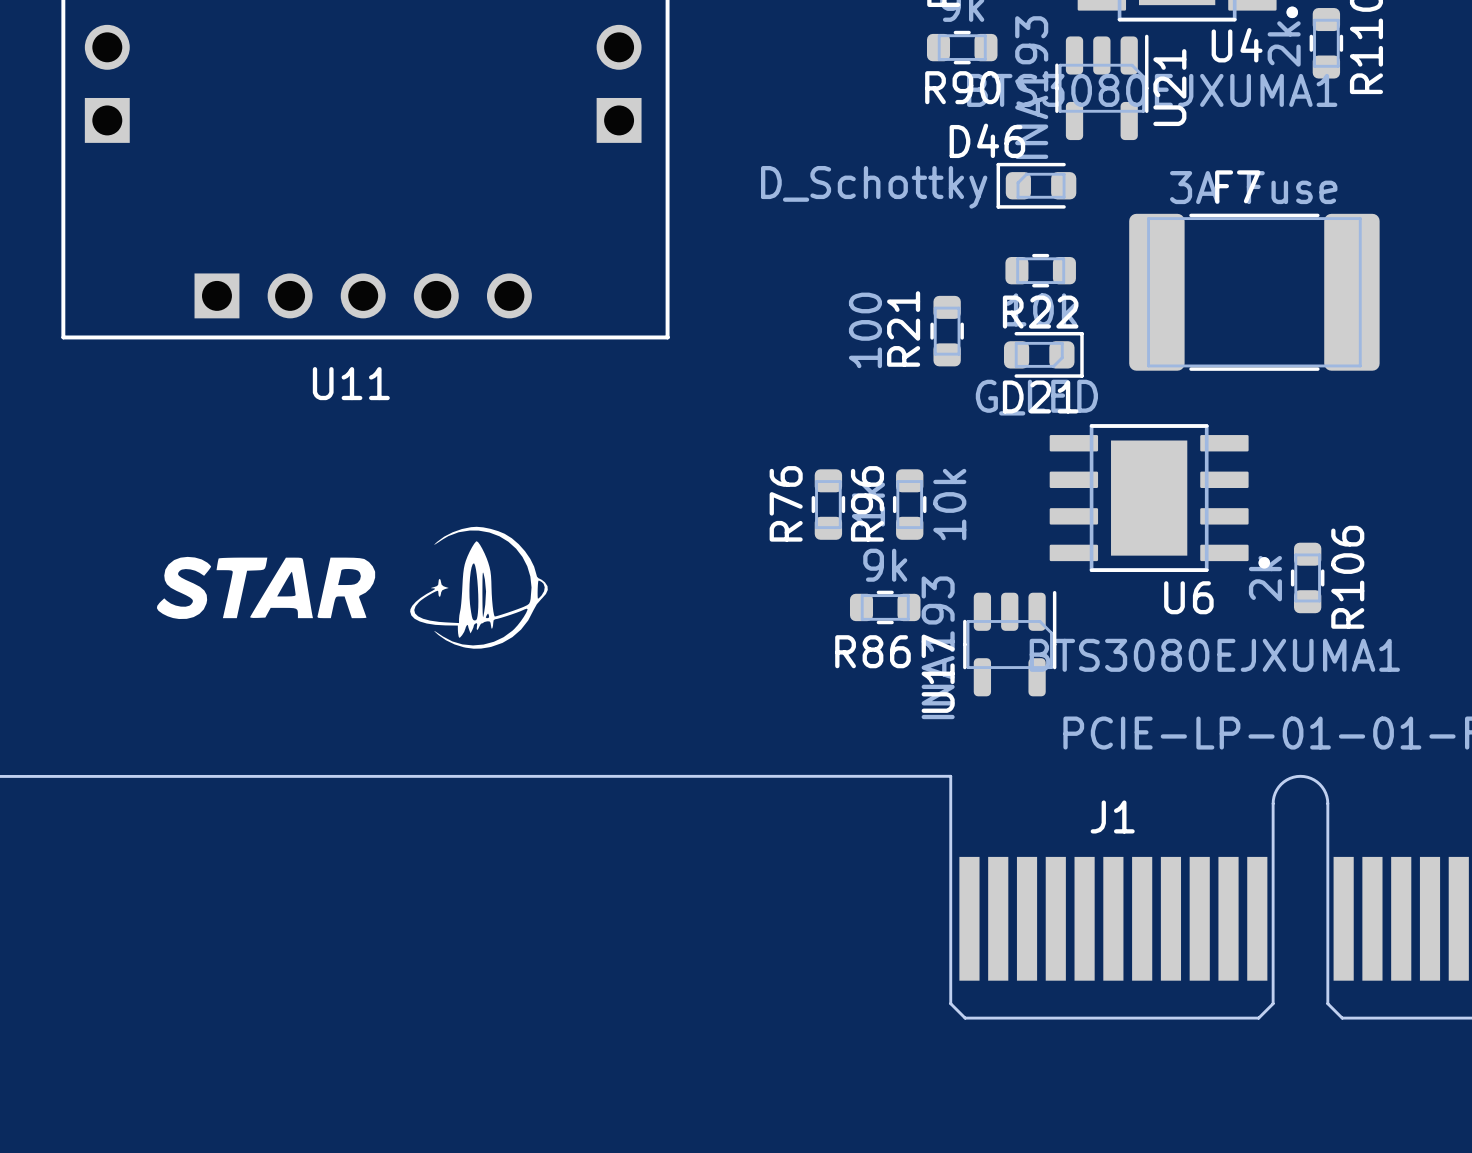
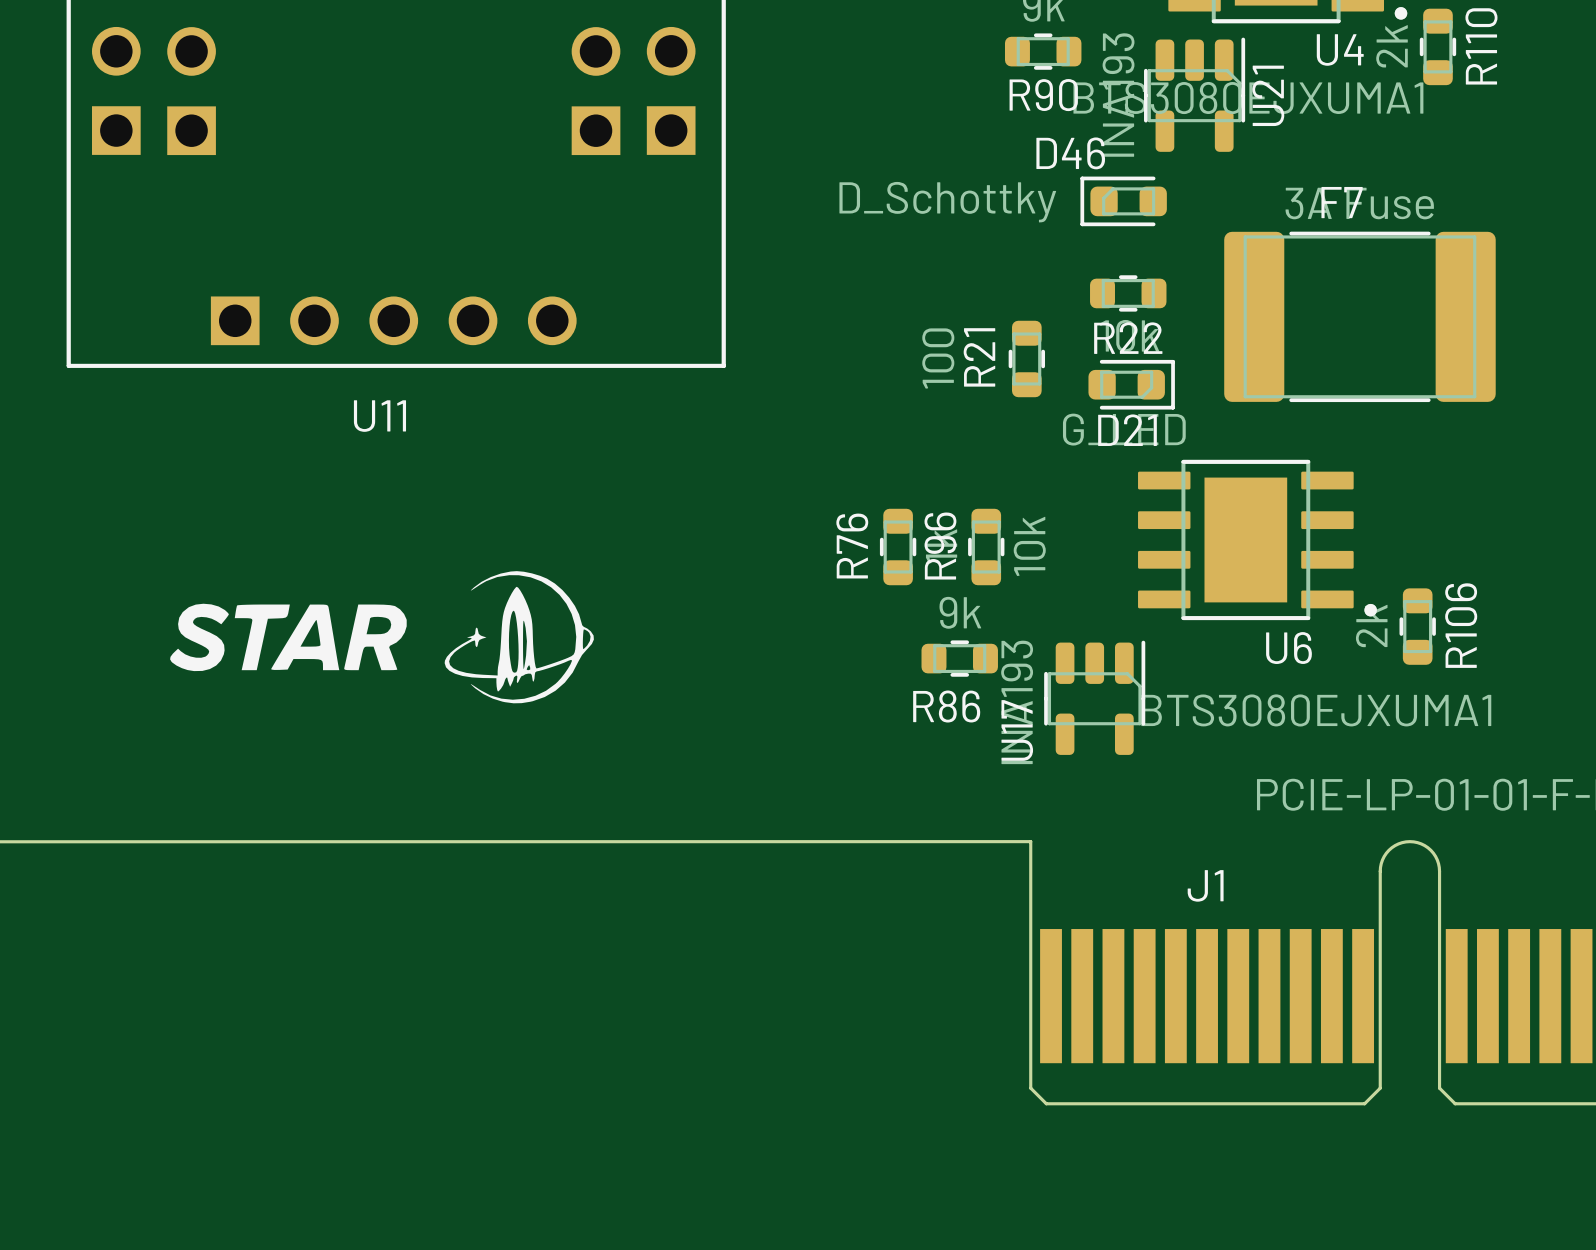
part: none -> (191, 51)
part: none -> (596, 51)
part: none -> (191, 130)
part: none -> (596, 130)

